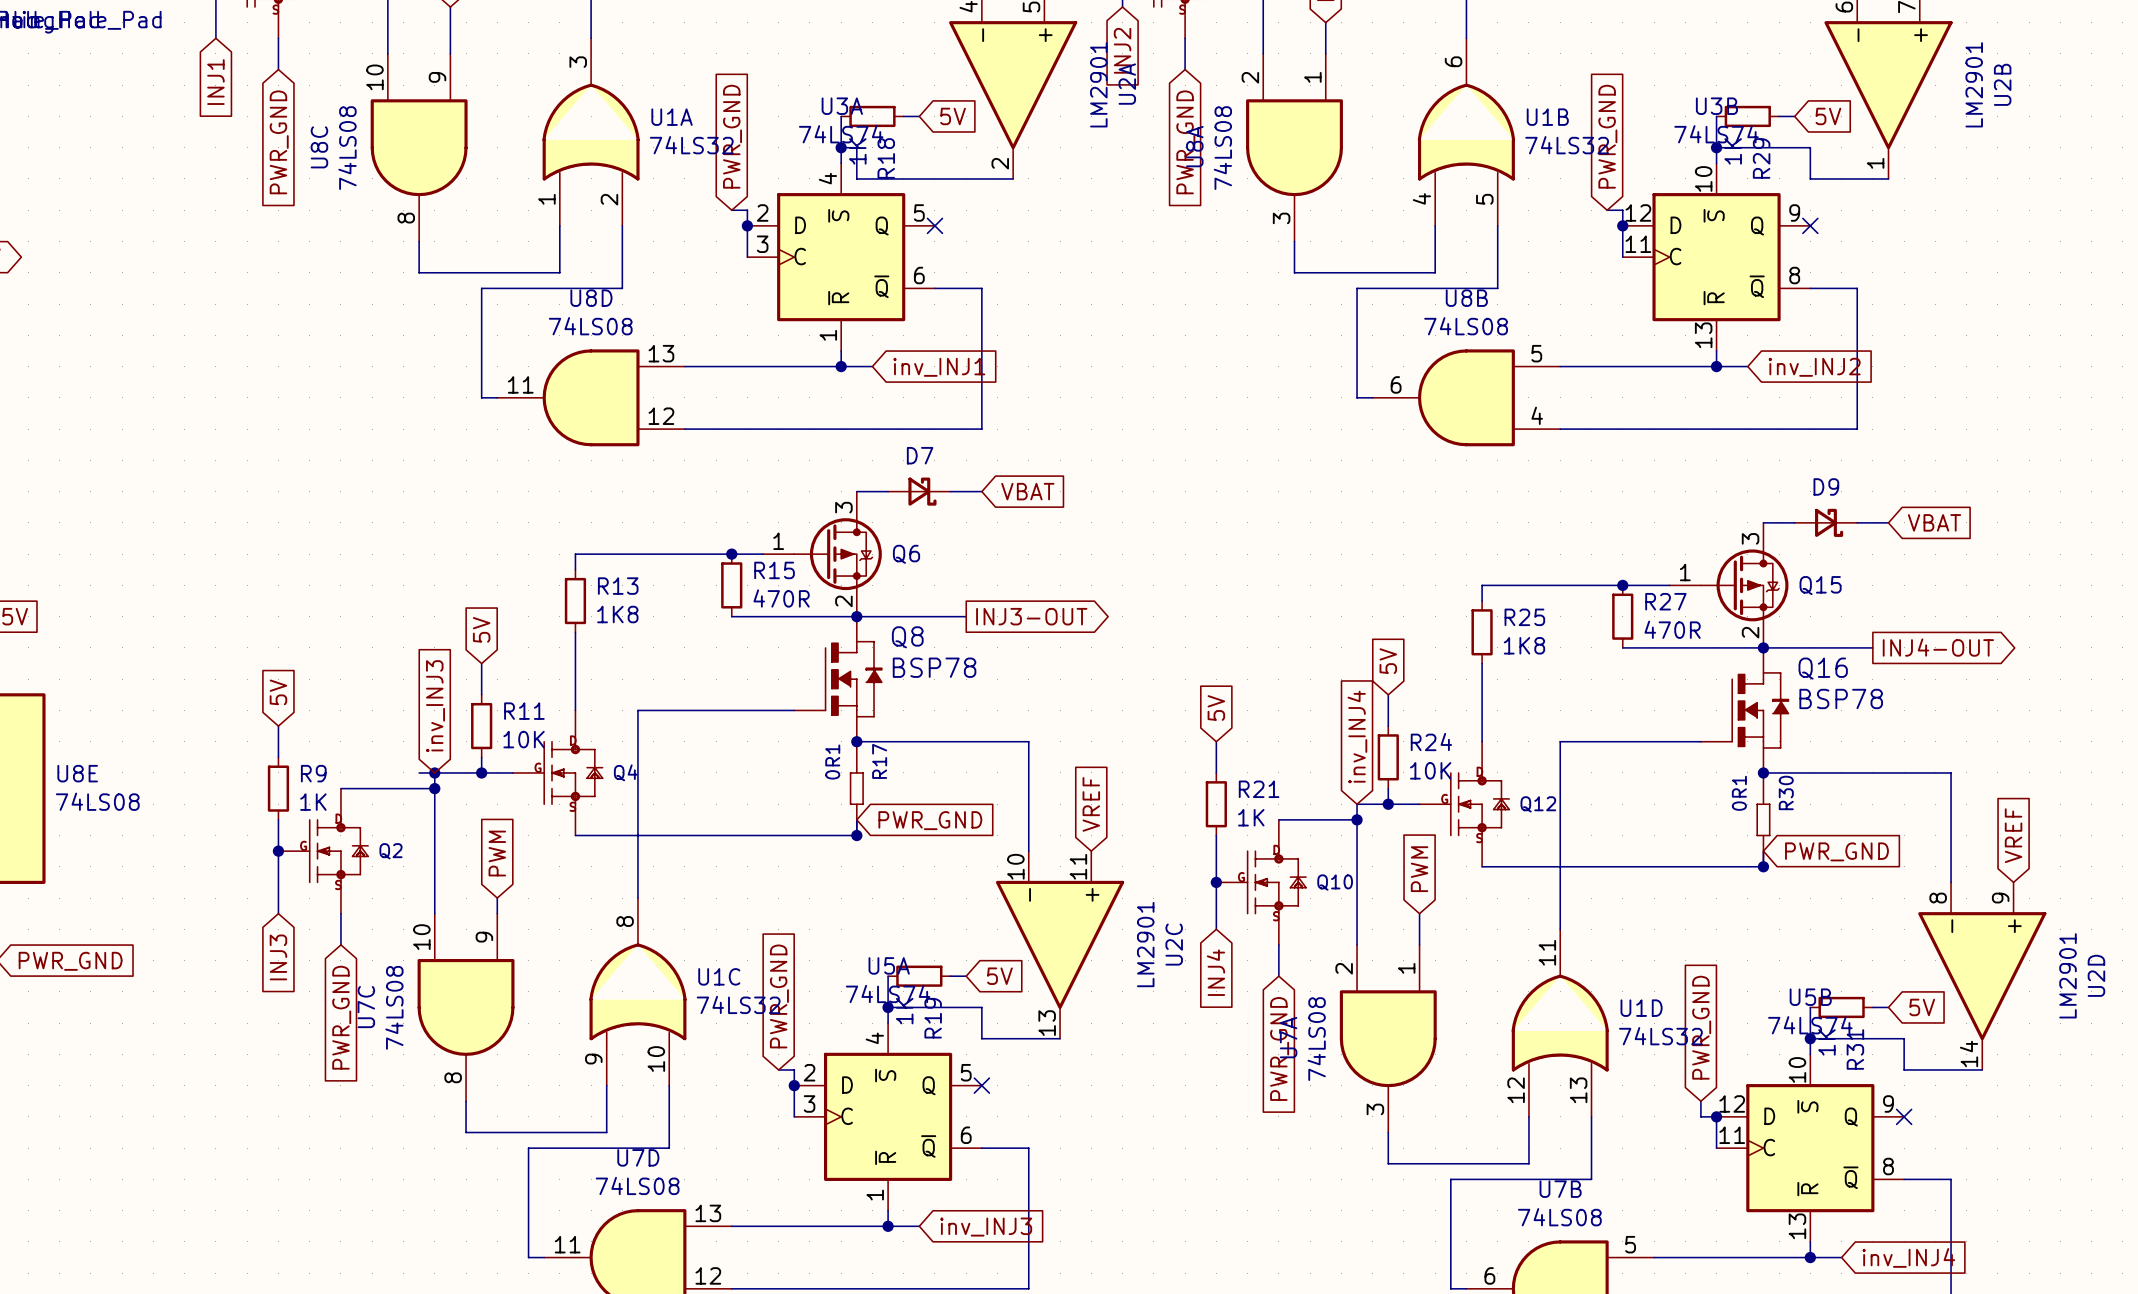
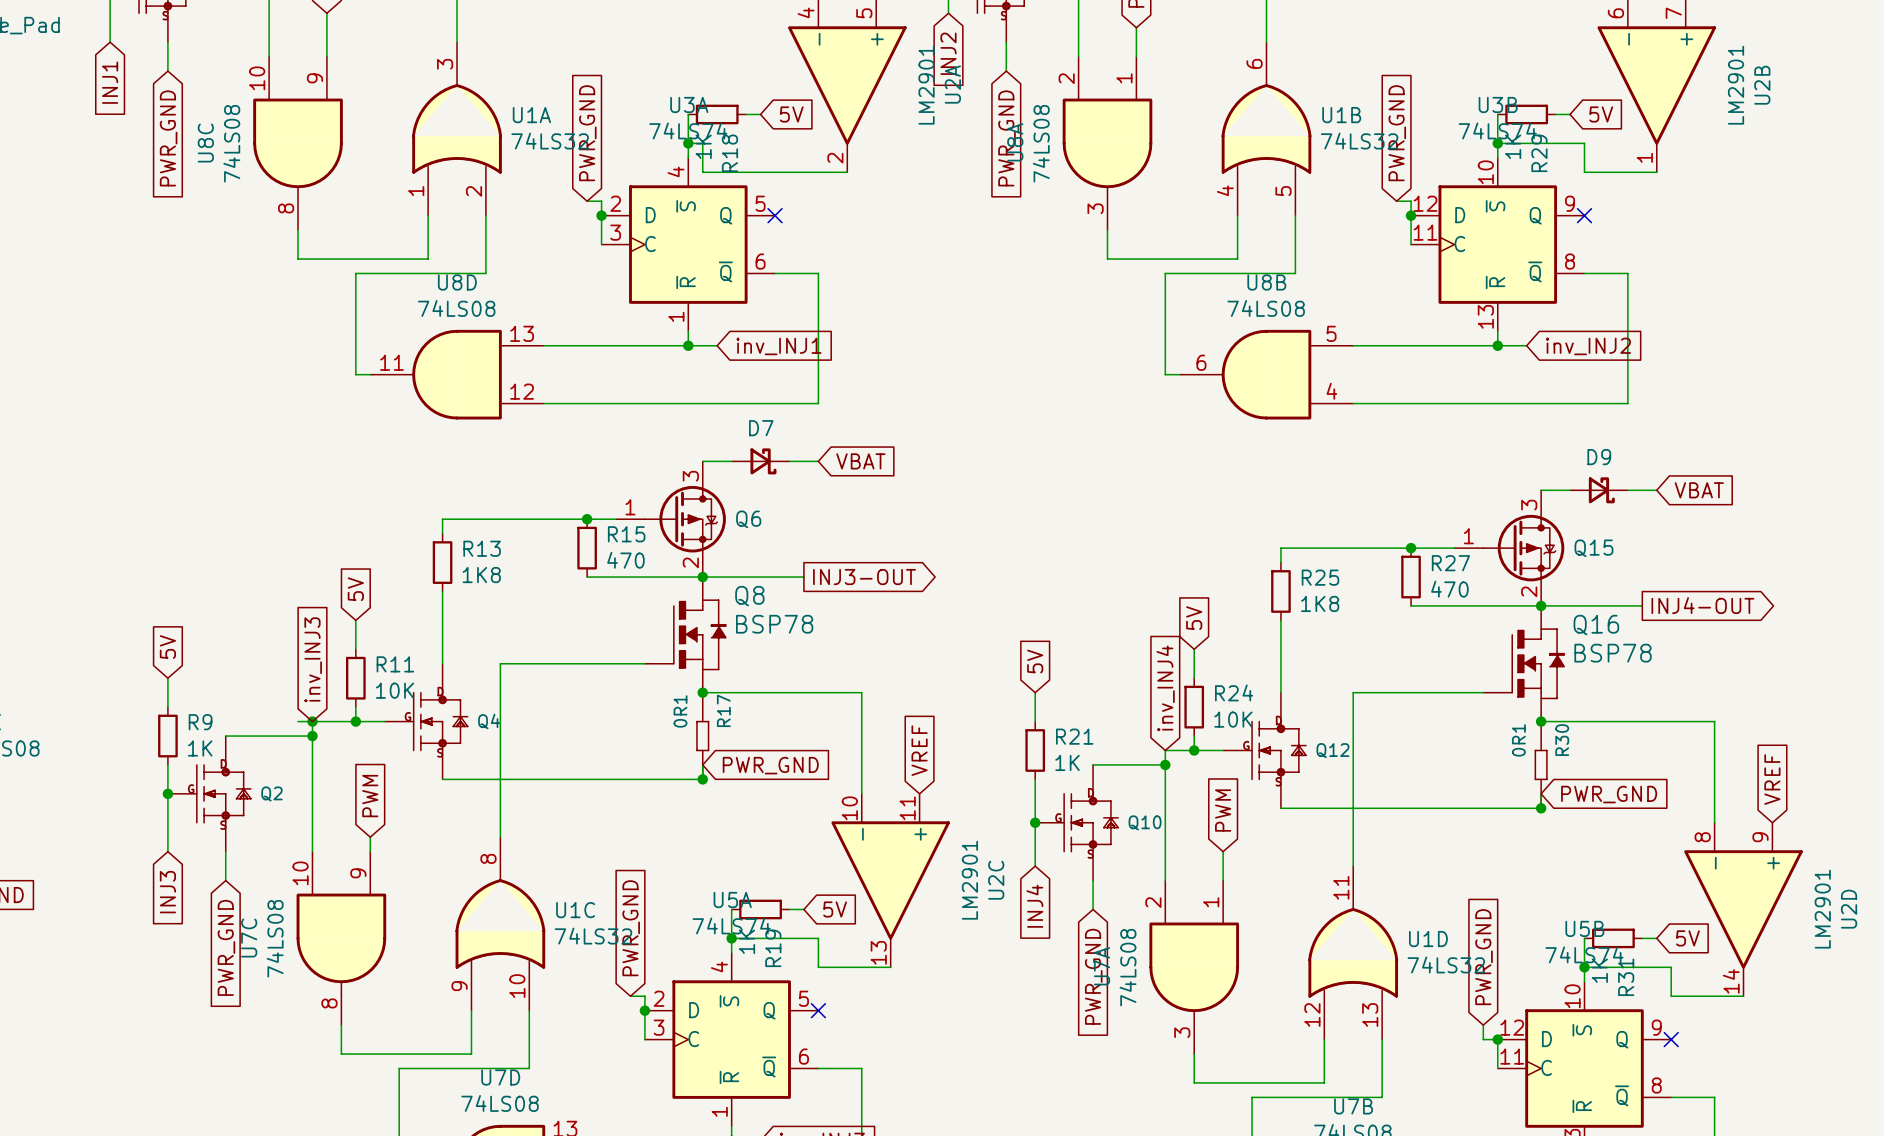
R15 value: 470R (781, 598) -> 470 (625, 560)
R27 value: 470R (1672, 629) -> 470 (1449, 589)

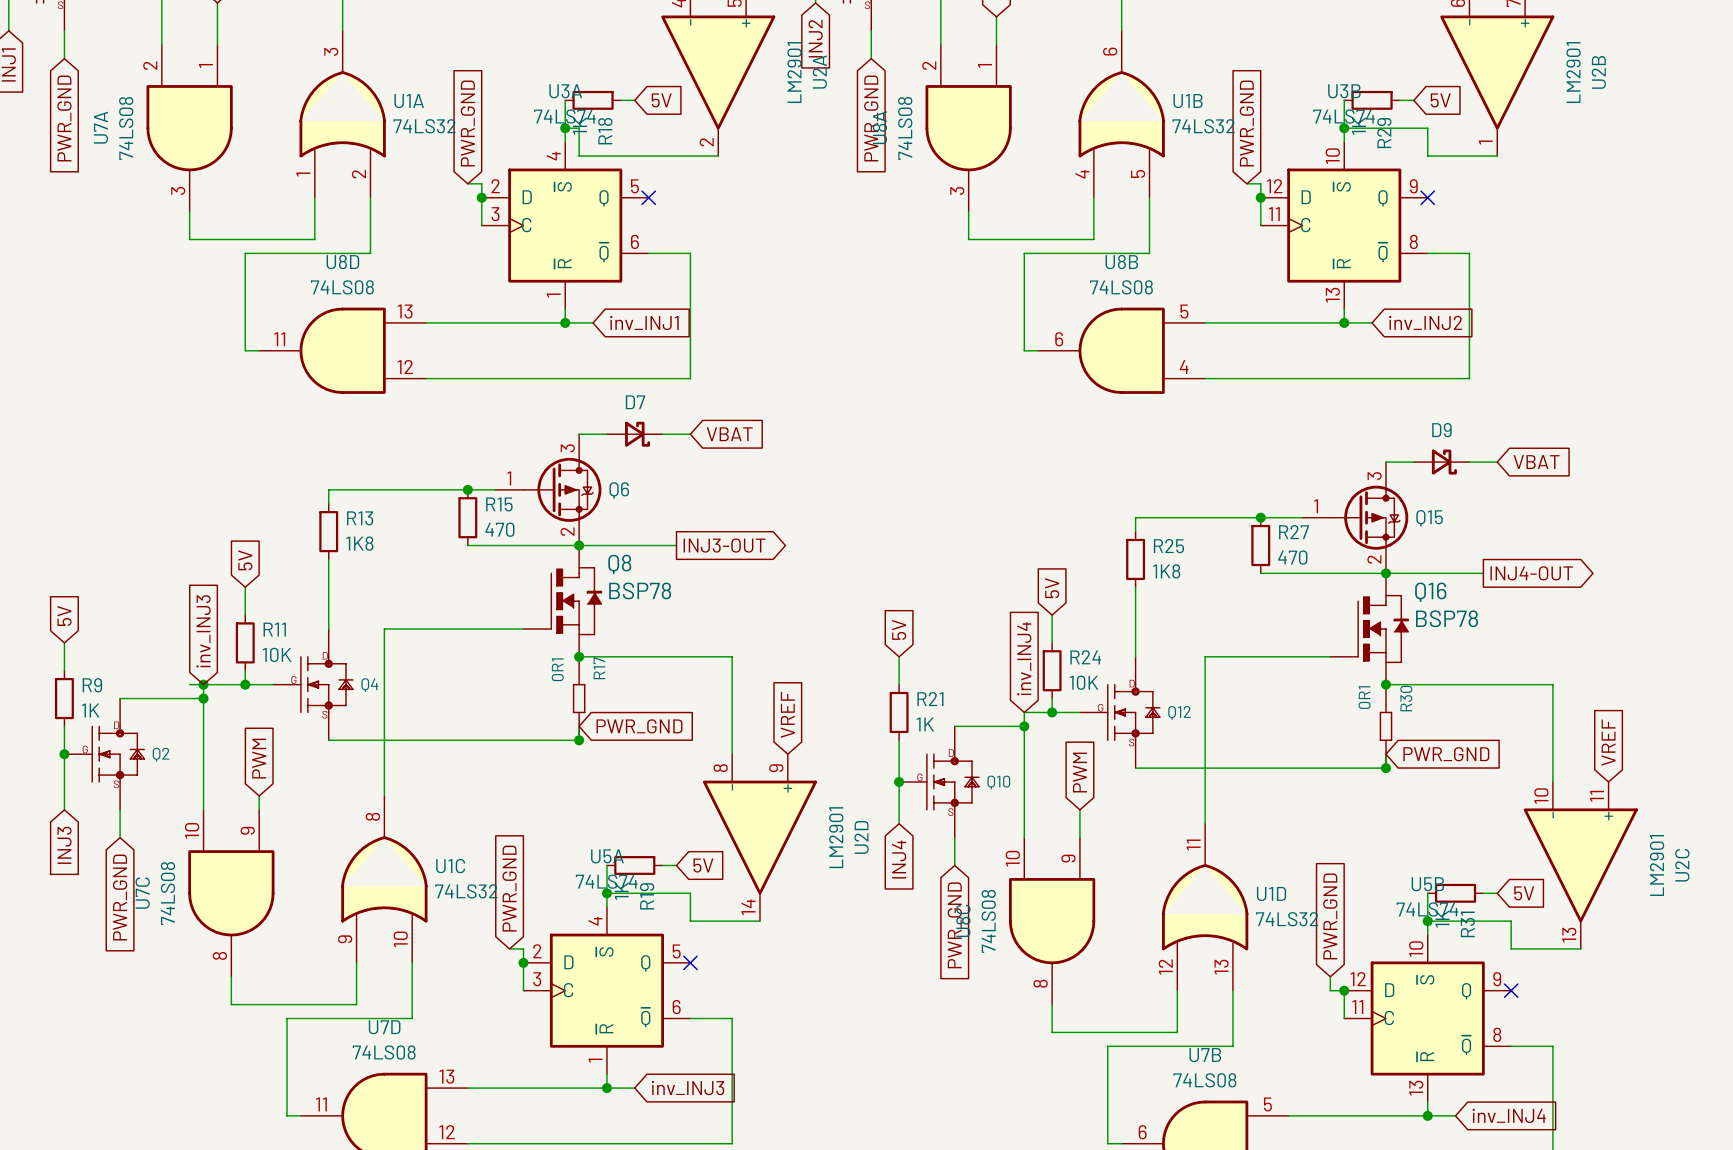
U8C position: (298, 143) -> (1052, 921)
U2C position: (890, 880) -> (1580, 865)
U2D position: (1743, 909) -> (759, 837)
U7A position: (1194, 967) -> (189, 128)

